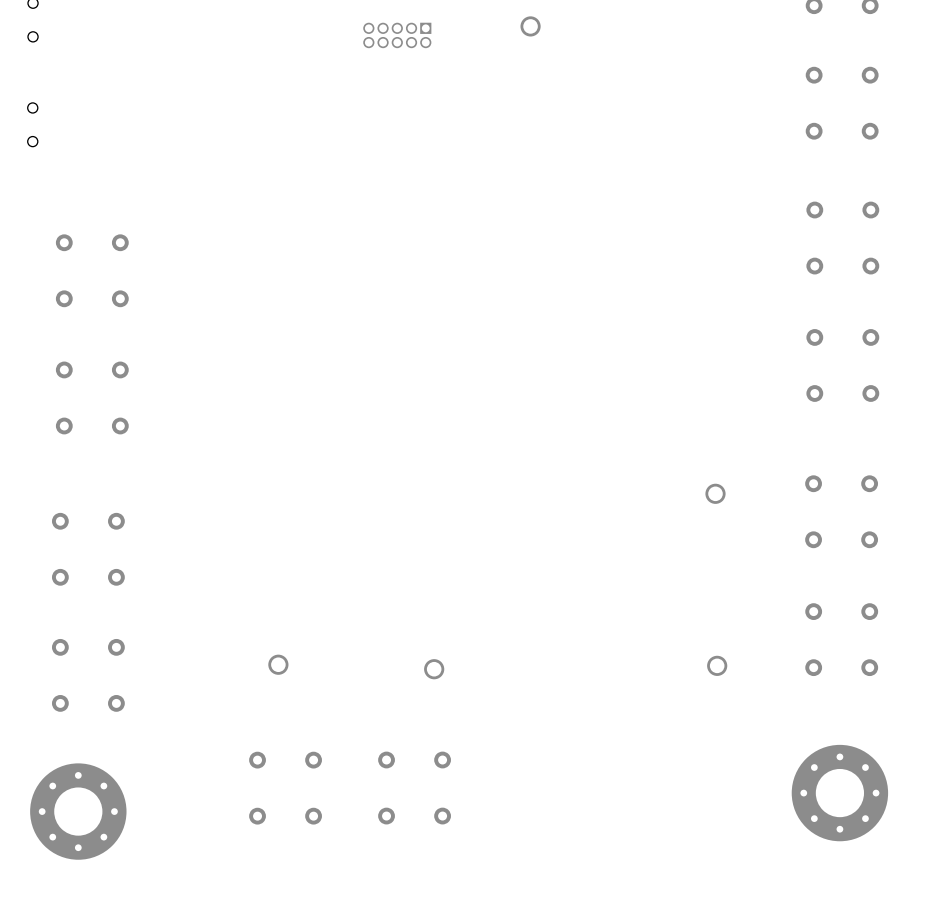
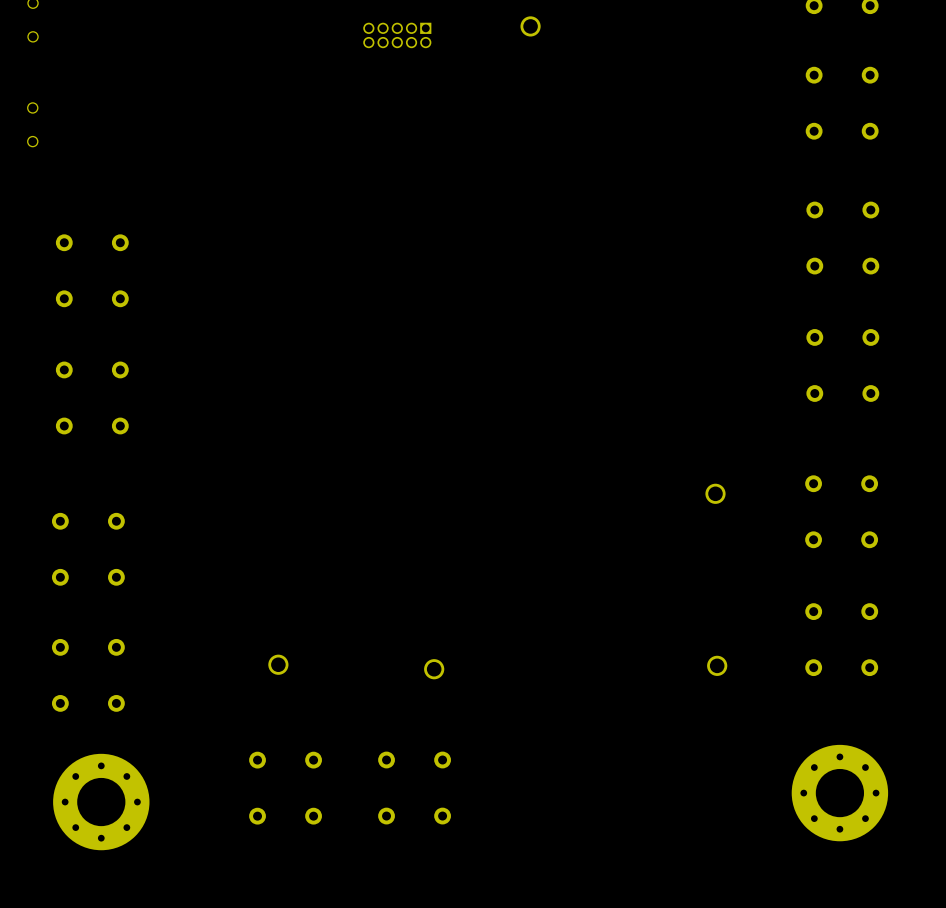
part position: (78, 811) -> (101, 802)

